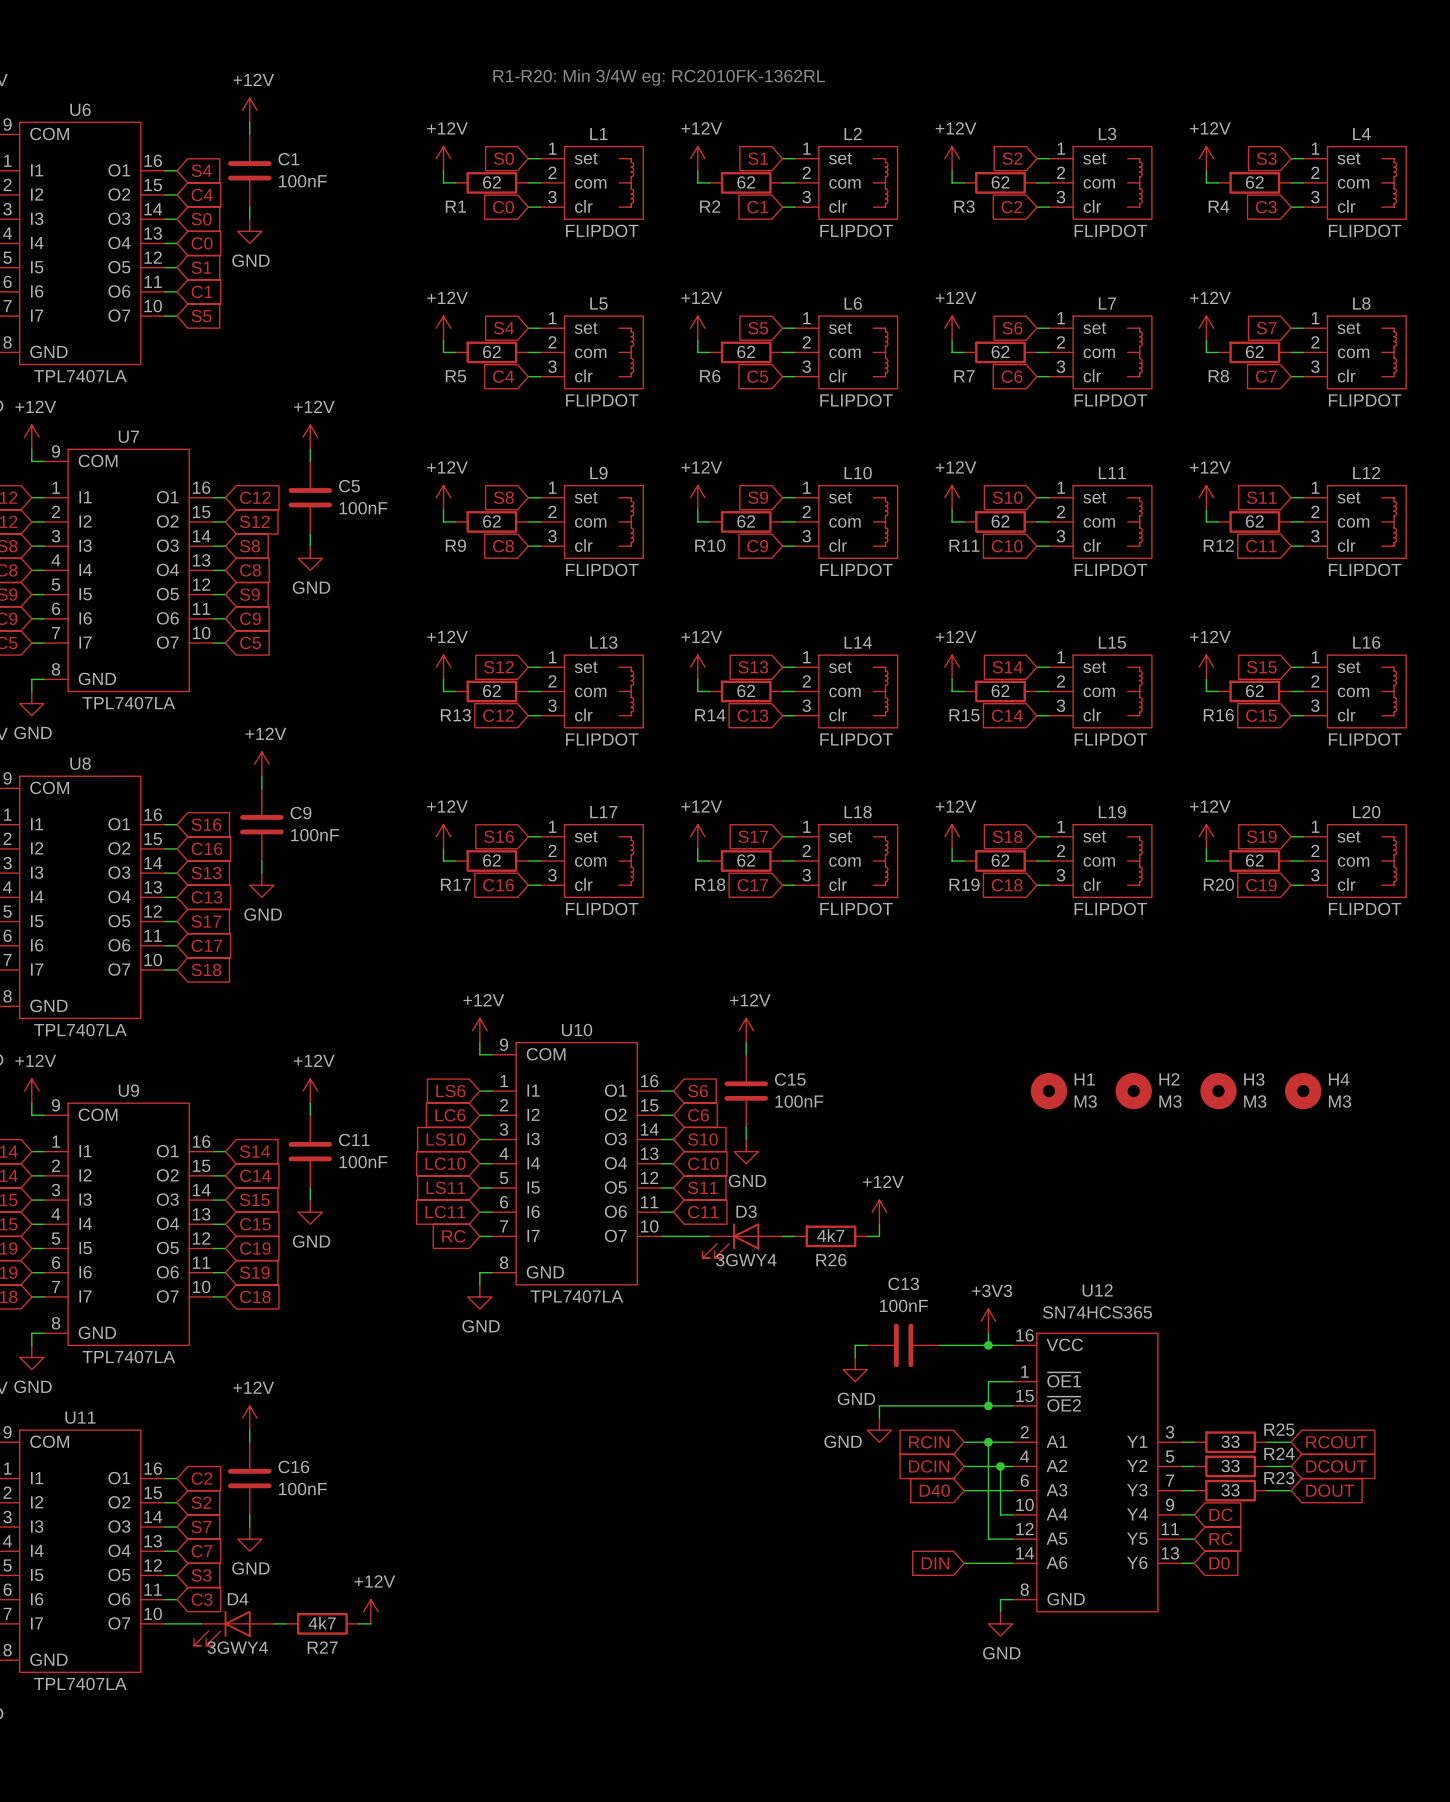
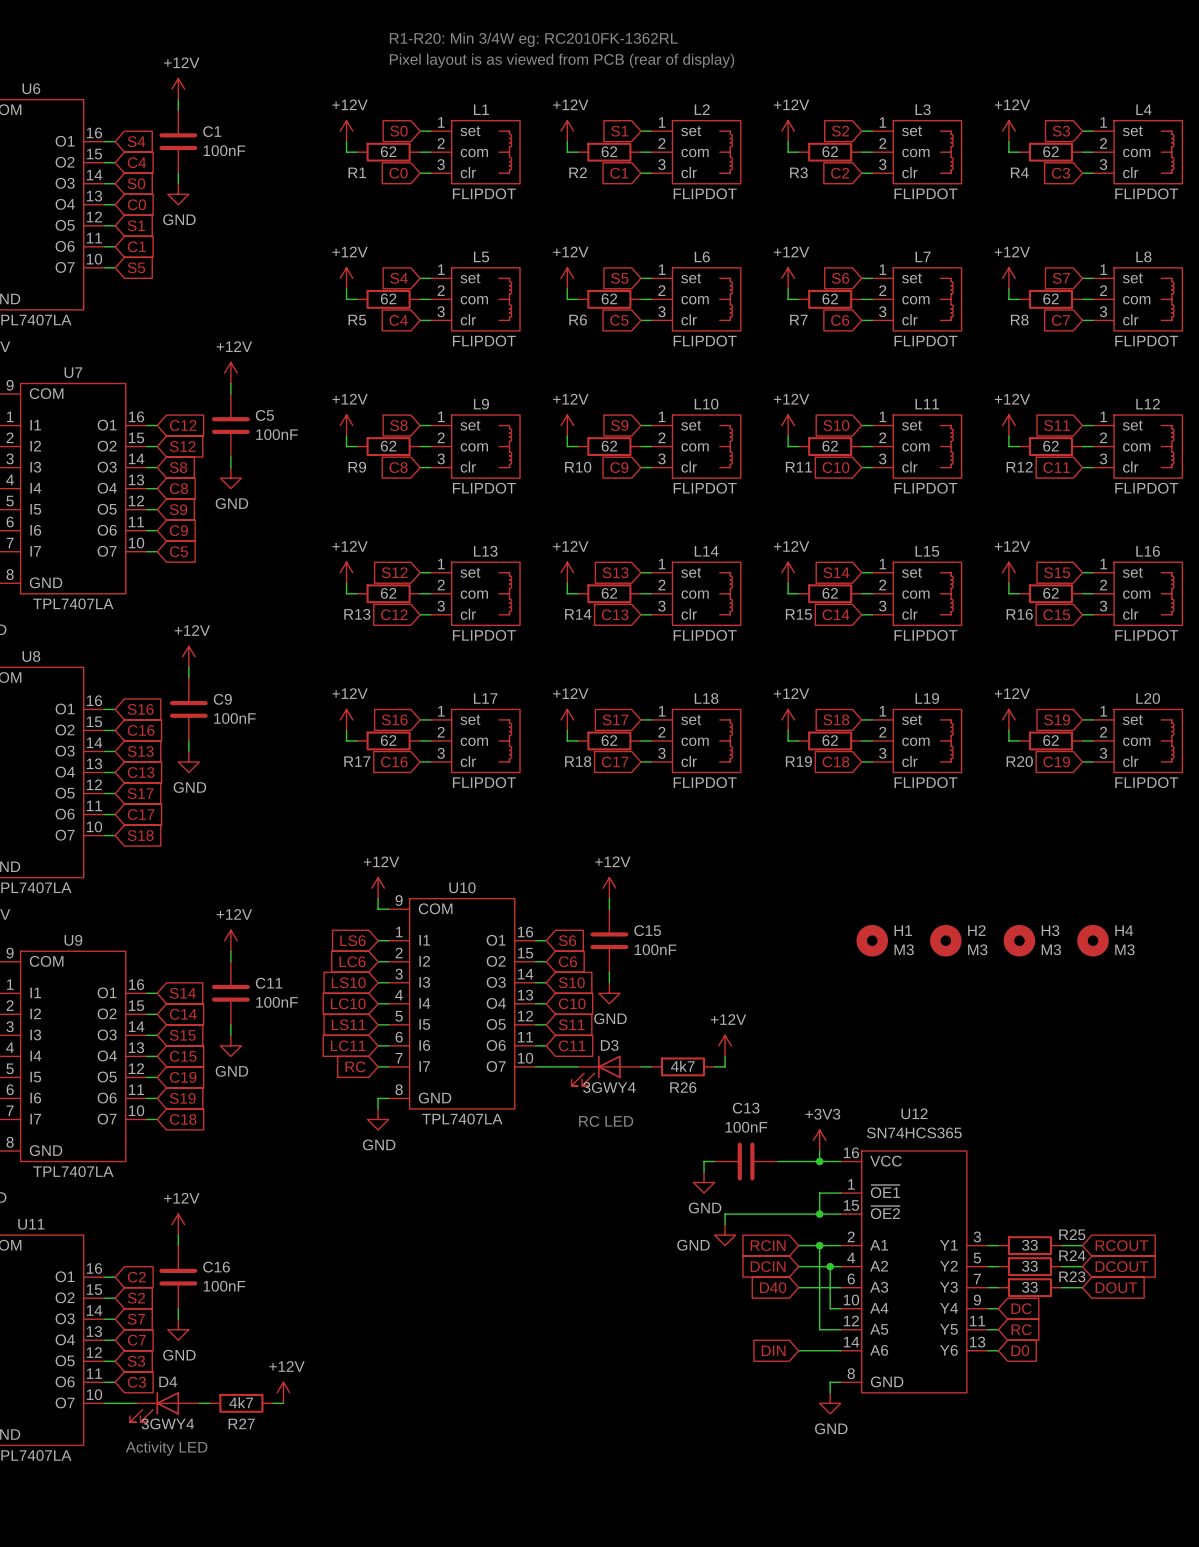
text: none -> R1-R20: Min 3/4W eg: RC2010FK-1362RL (533, 39)
text: R1-R20: Min 3/4W eg: RC2010FK-1362RL (659, 77) -> Pixel layout is as viewed from PCB (rear of display) (562, 60)
text: none -> RC LED (606, 1121)
text: none -> Activity LED (166, 1448)

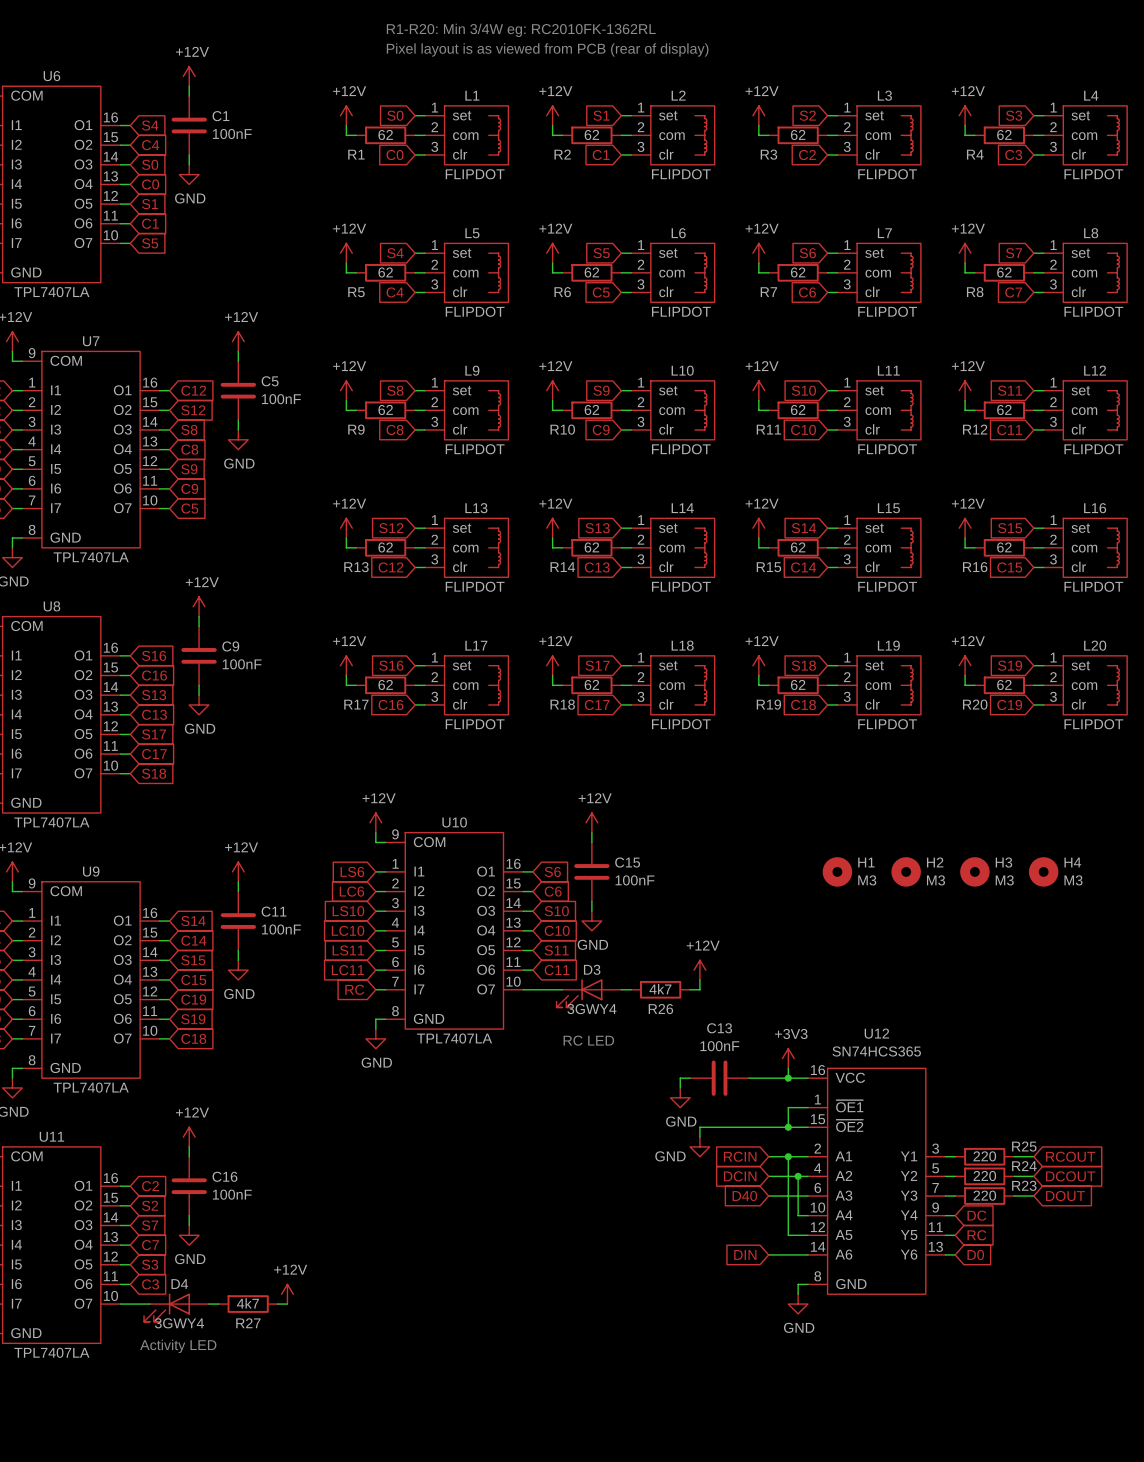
R25 value: 33 (1029, 1245) -> 220 (984, 1156)
R24 value: 33 (1029, 1266) -> 220 (984, 1176)
R23 value: 33 (1029, 1287) -> 220 (984, 1195)

